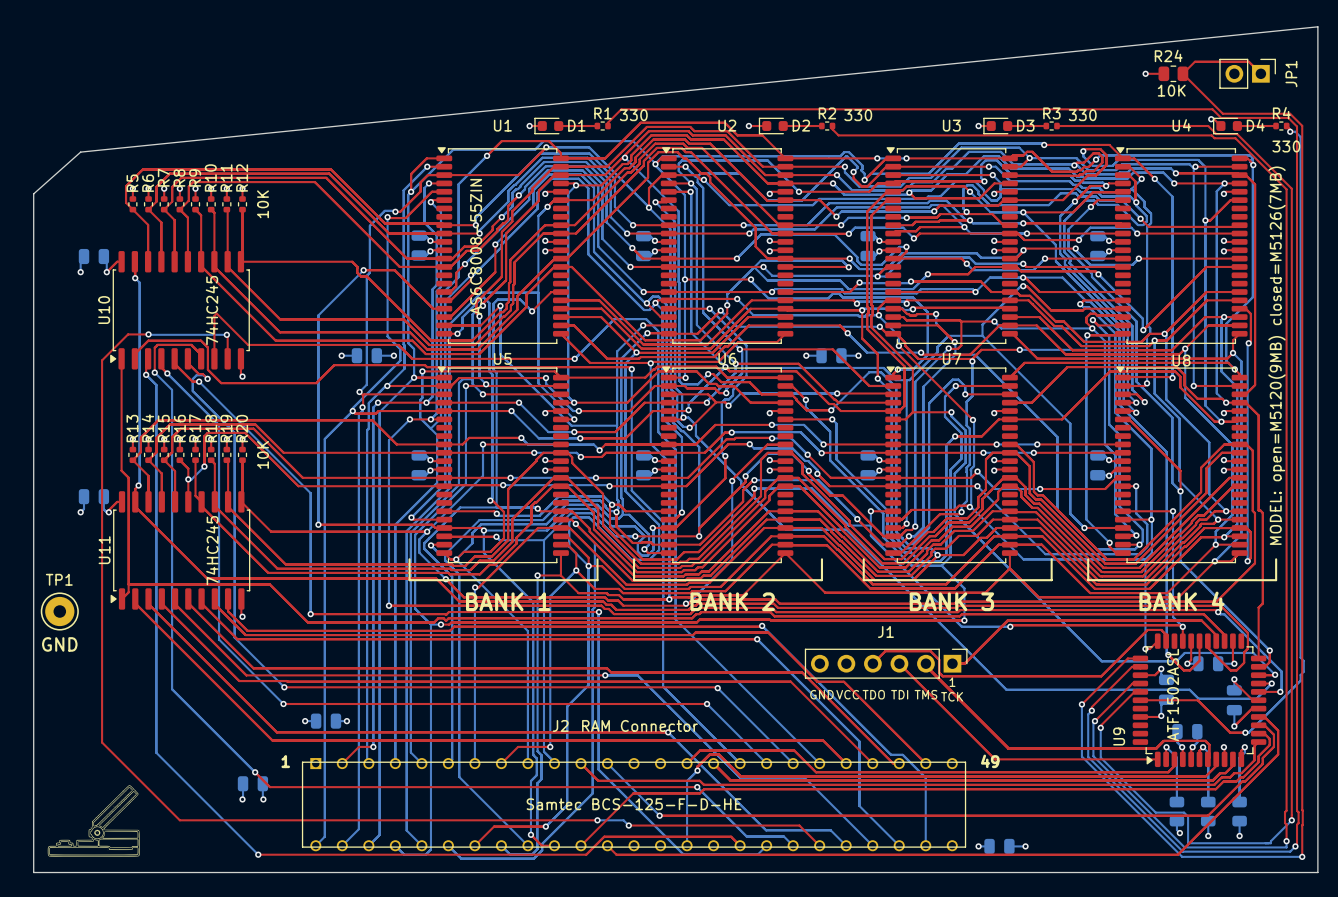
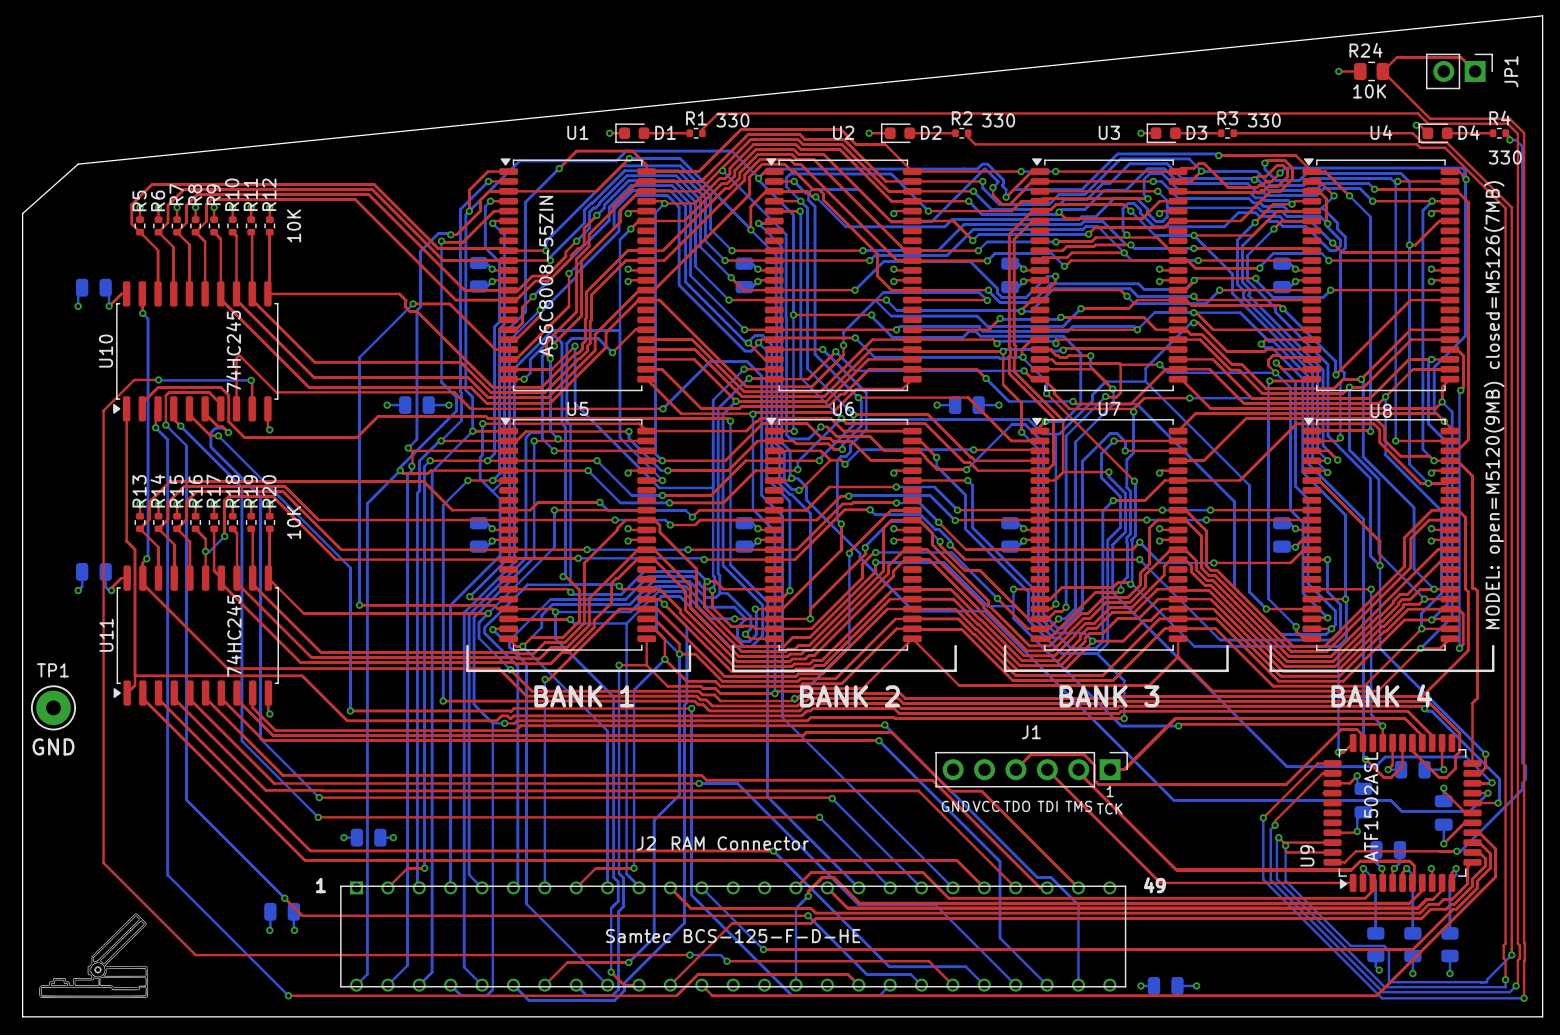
top track: (1132, 683) (1094, 721) -> (1332, 842) (1283, 842) (1278, 837)
top track: (1136, 689) (1098, 727) -> none
top track: (1140, 700) (1197, 700) (1230, 732) -> (1332, 862) (1344, 862) (1355, 851) (1438, 851)
top track: none -> (1285, 850) (1287, 852) (1332, 852)

